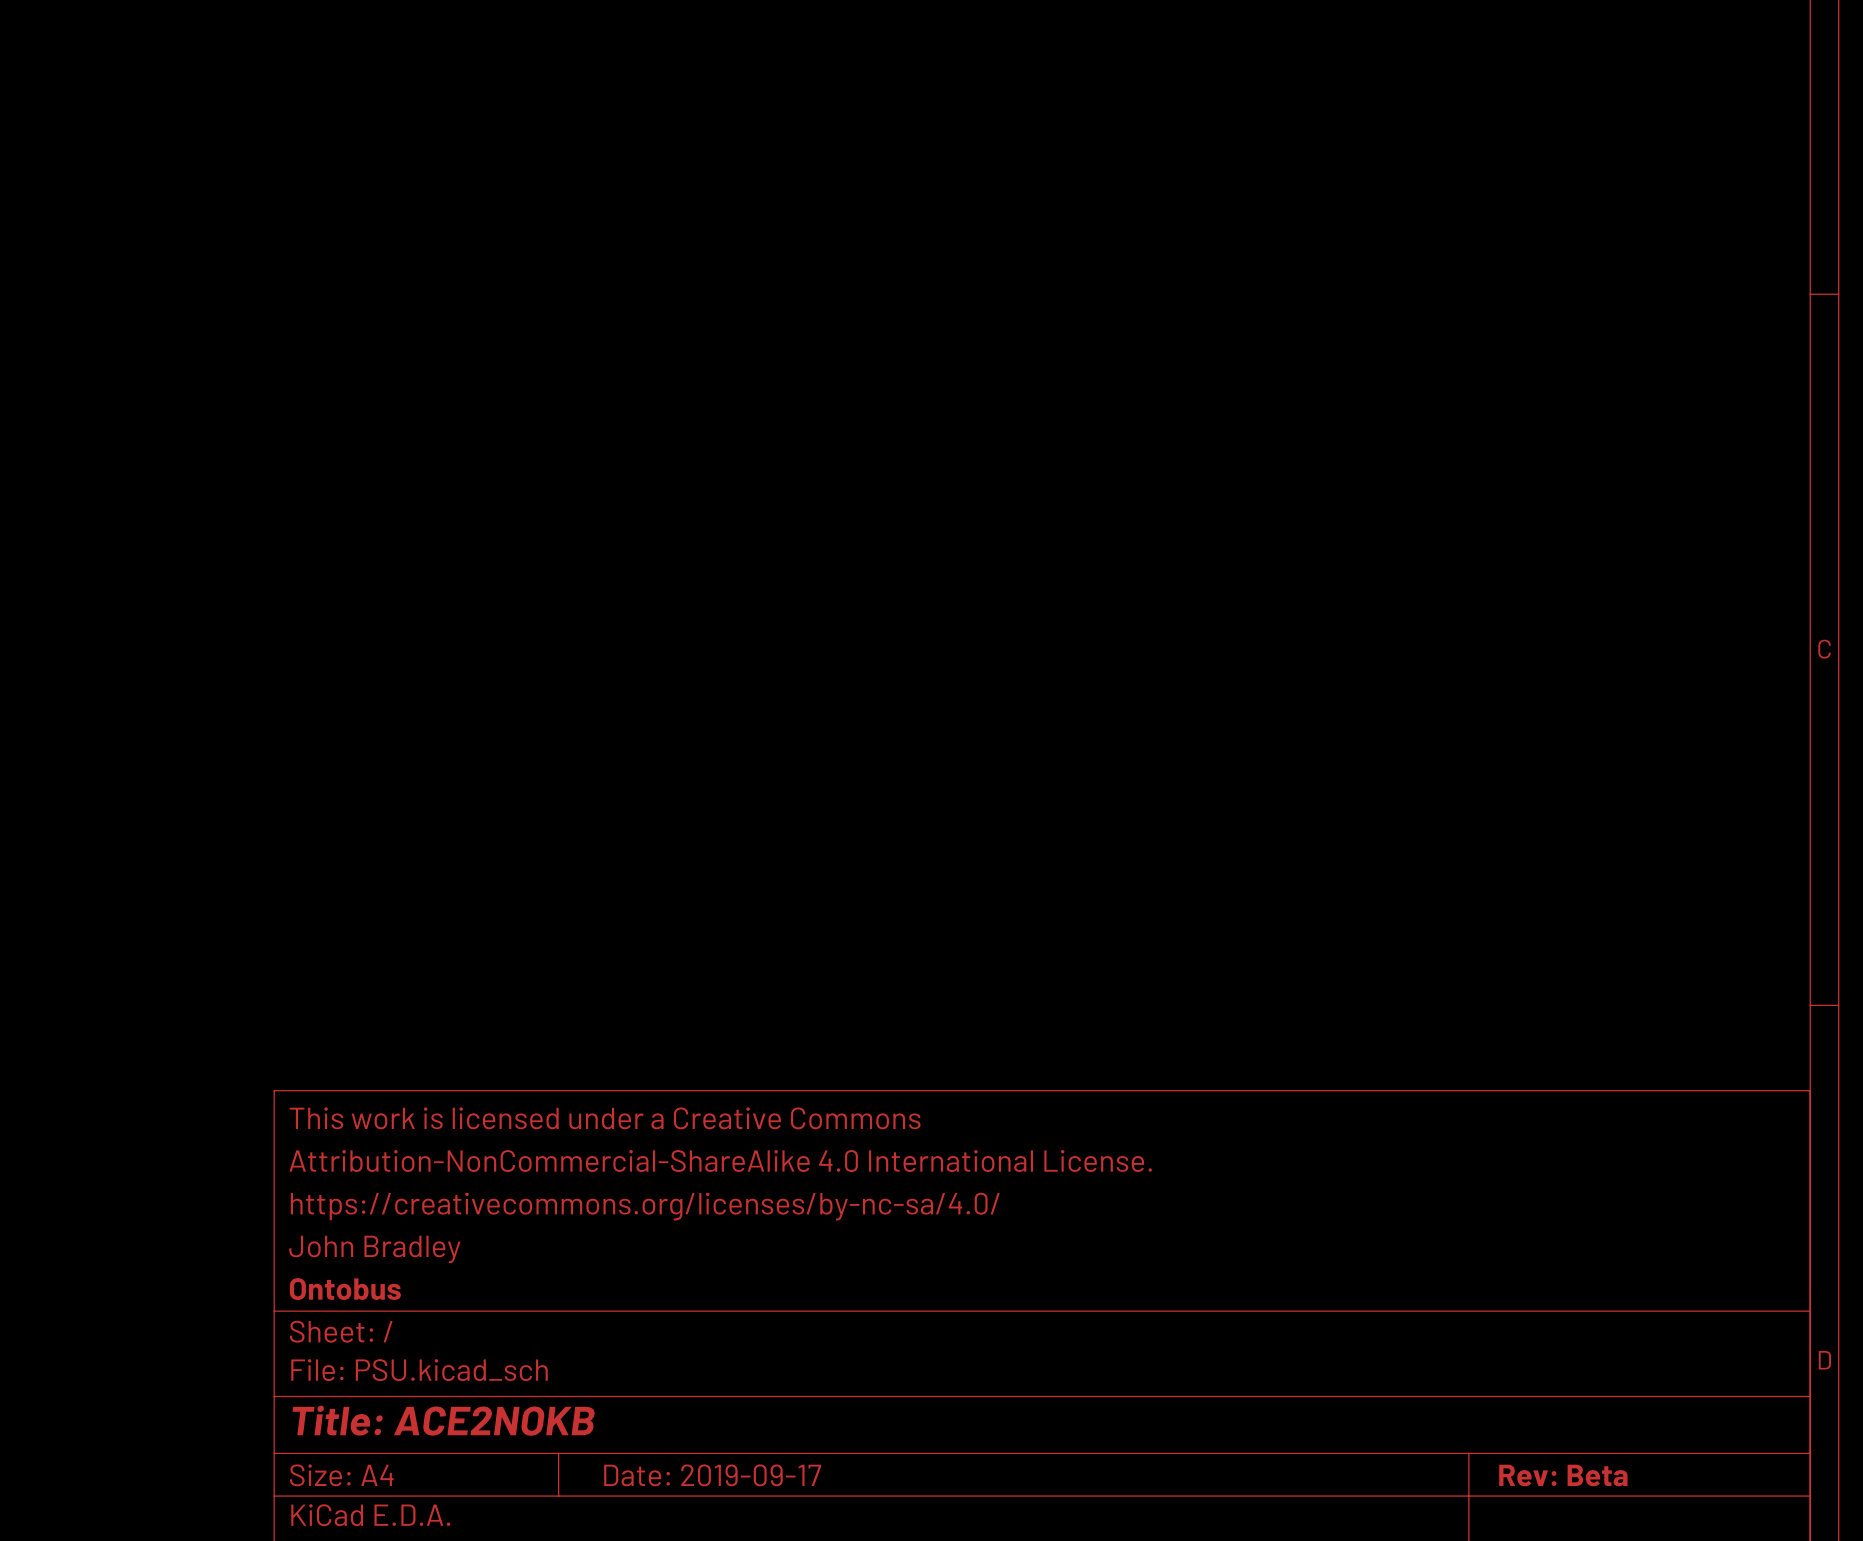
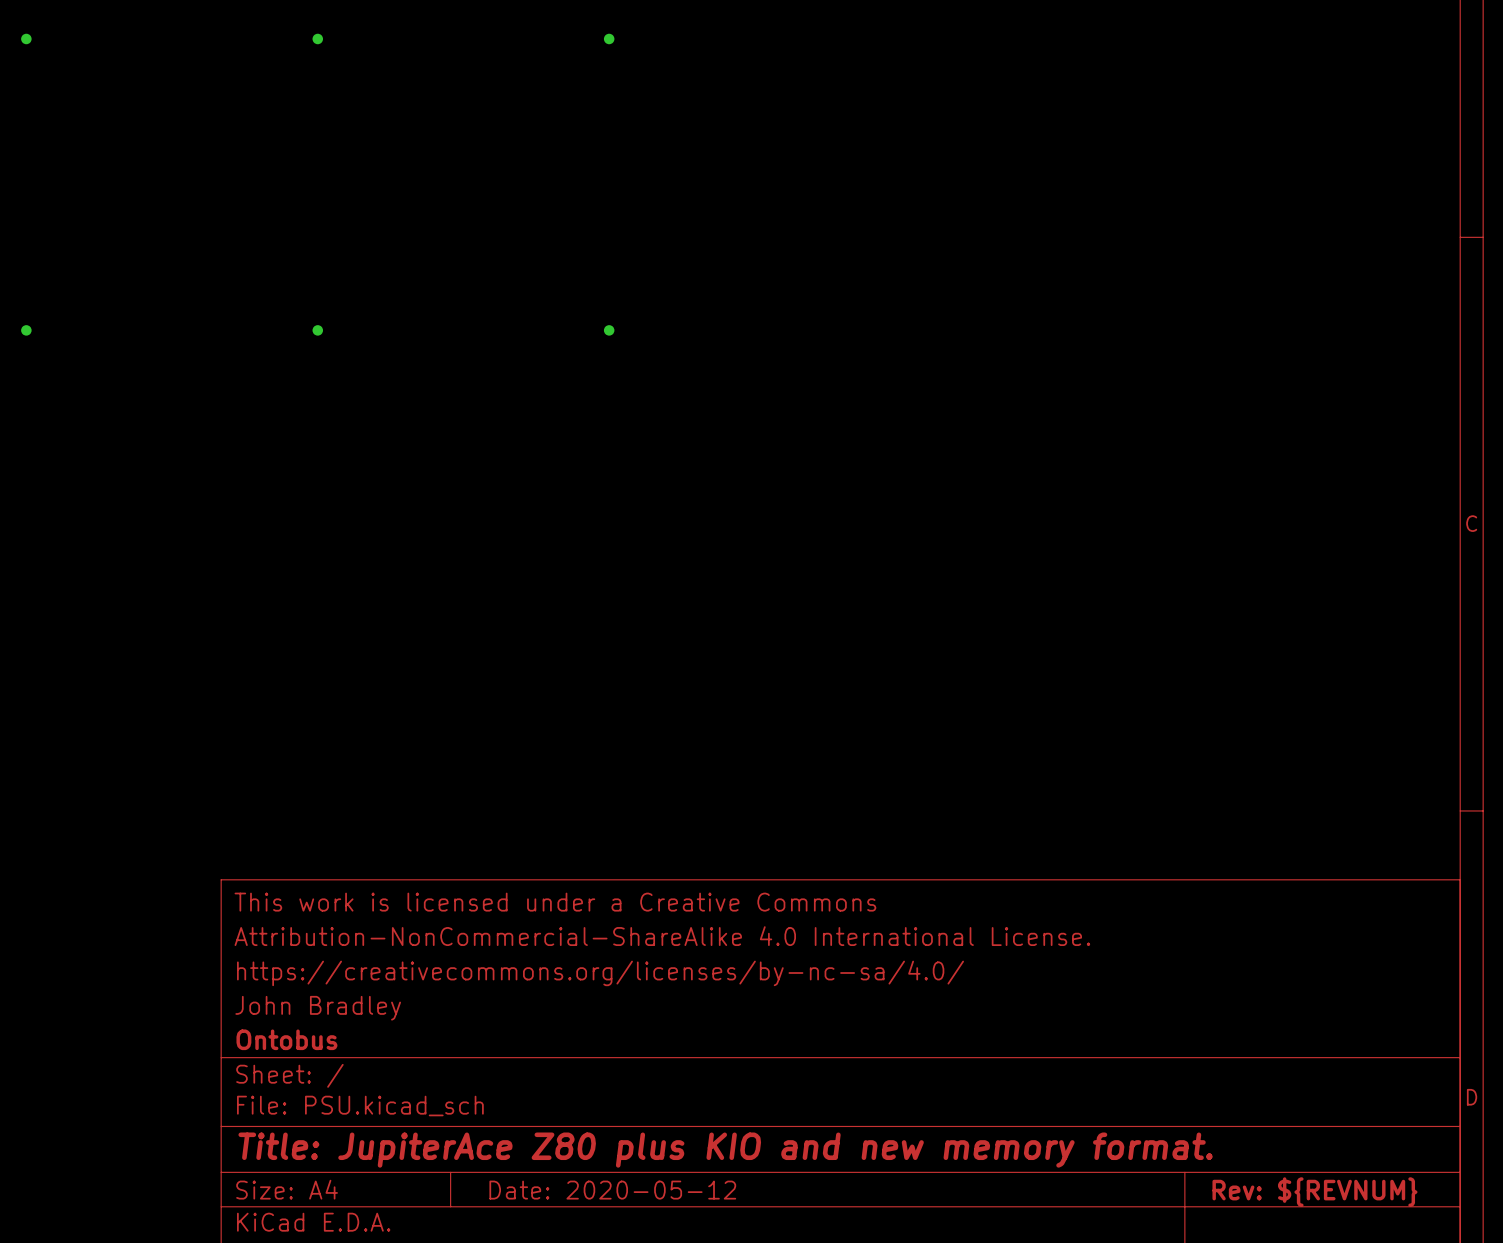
junction: none -> (26, 38)
junction: none -> (317, 38)
junction: none -> (609, 38)
junction: none -> (26, 330)
junction: none -> (317, 330)
junction: none -> (609, 330)
title block: Title: ACE2NOKB (444, 1420) -> Title: JupiterAce Z80 plus KIO and new memory format. (725, 1150)
title block: Date: 2019-09-17 (712, 1475) -> Date: 2020-05-12 (612, 1190)
title block: Rev: Beta (1563, 1475) -> Rev: ${REVNUM} (1314, 1192)

